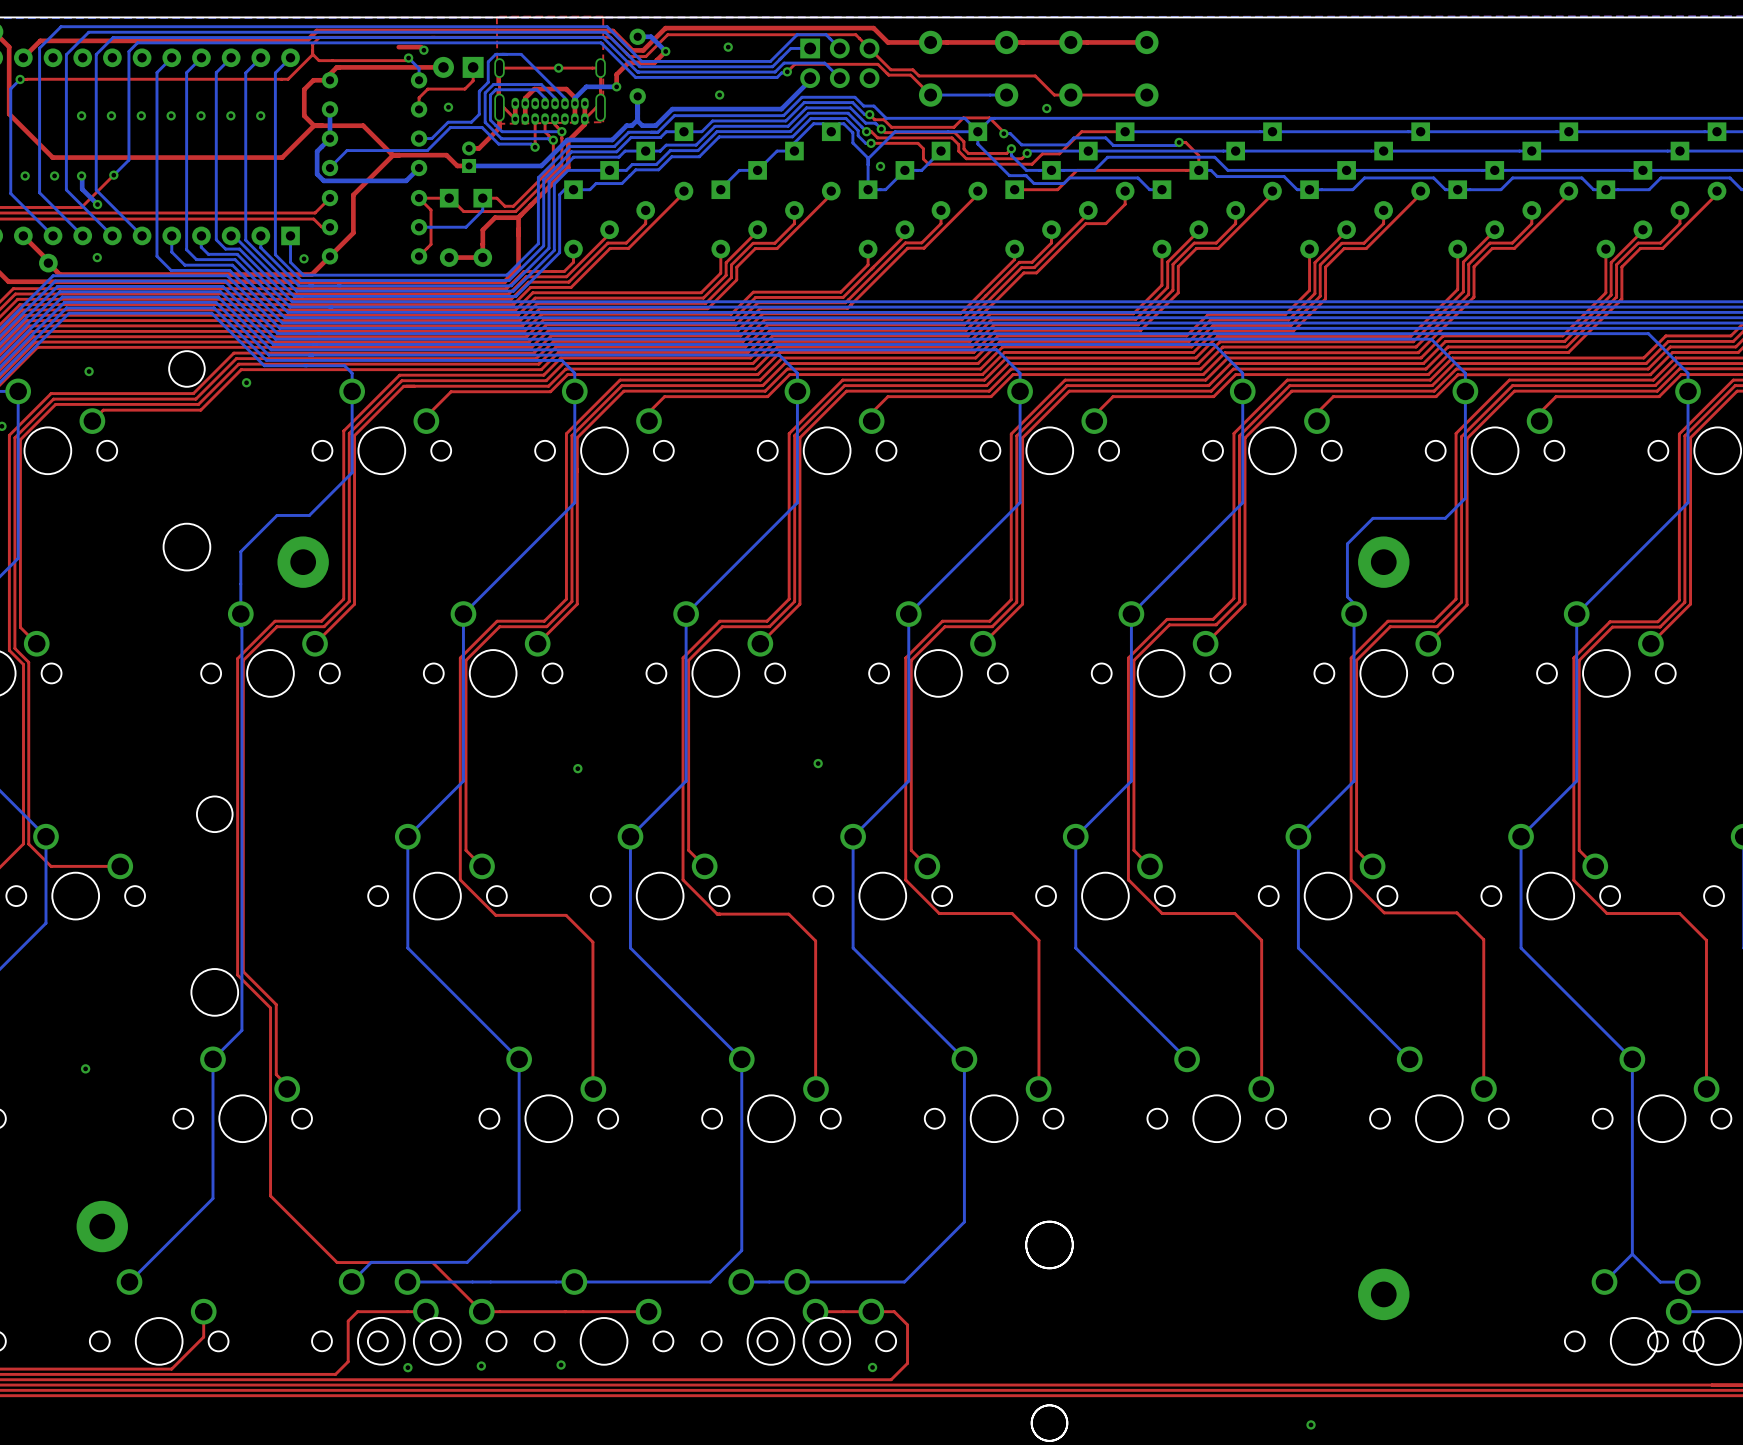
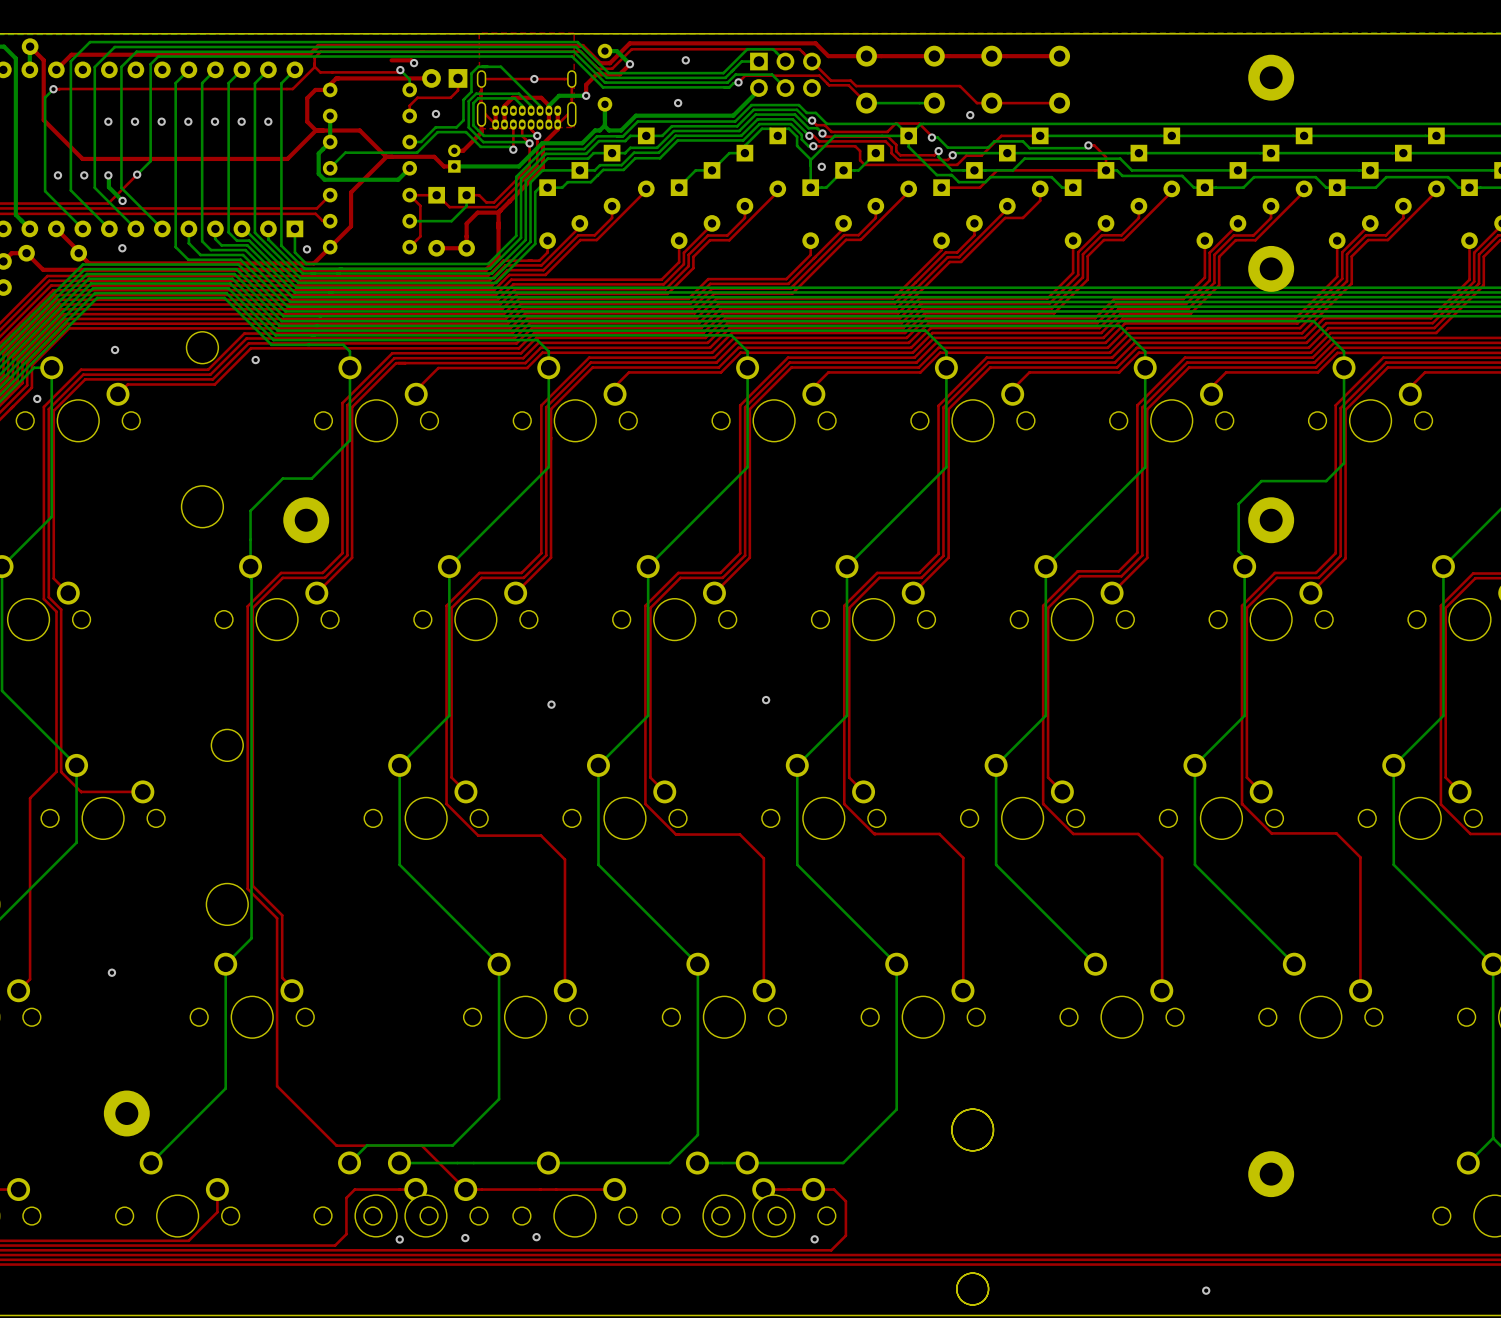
part: none -> (1271, 77)
part: none -> (1271, 268)

